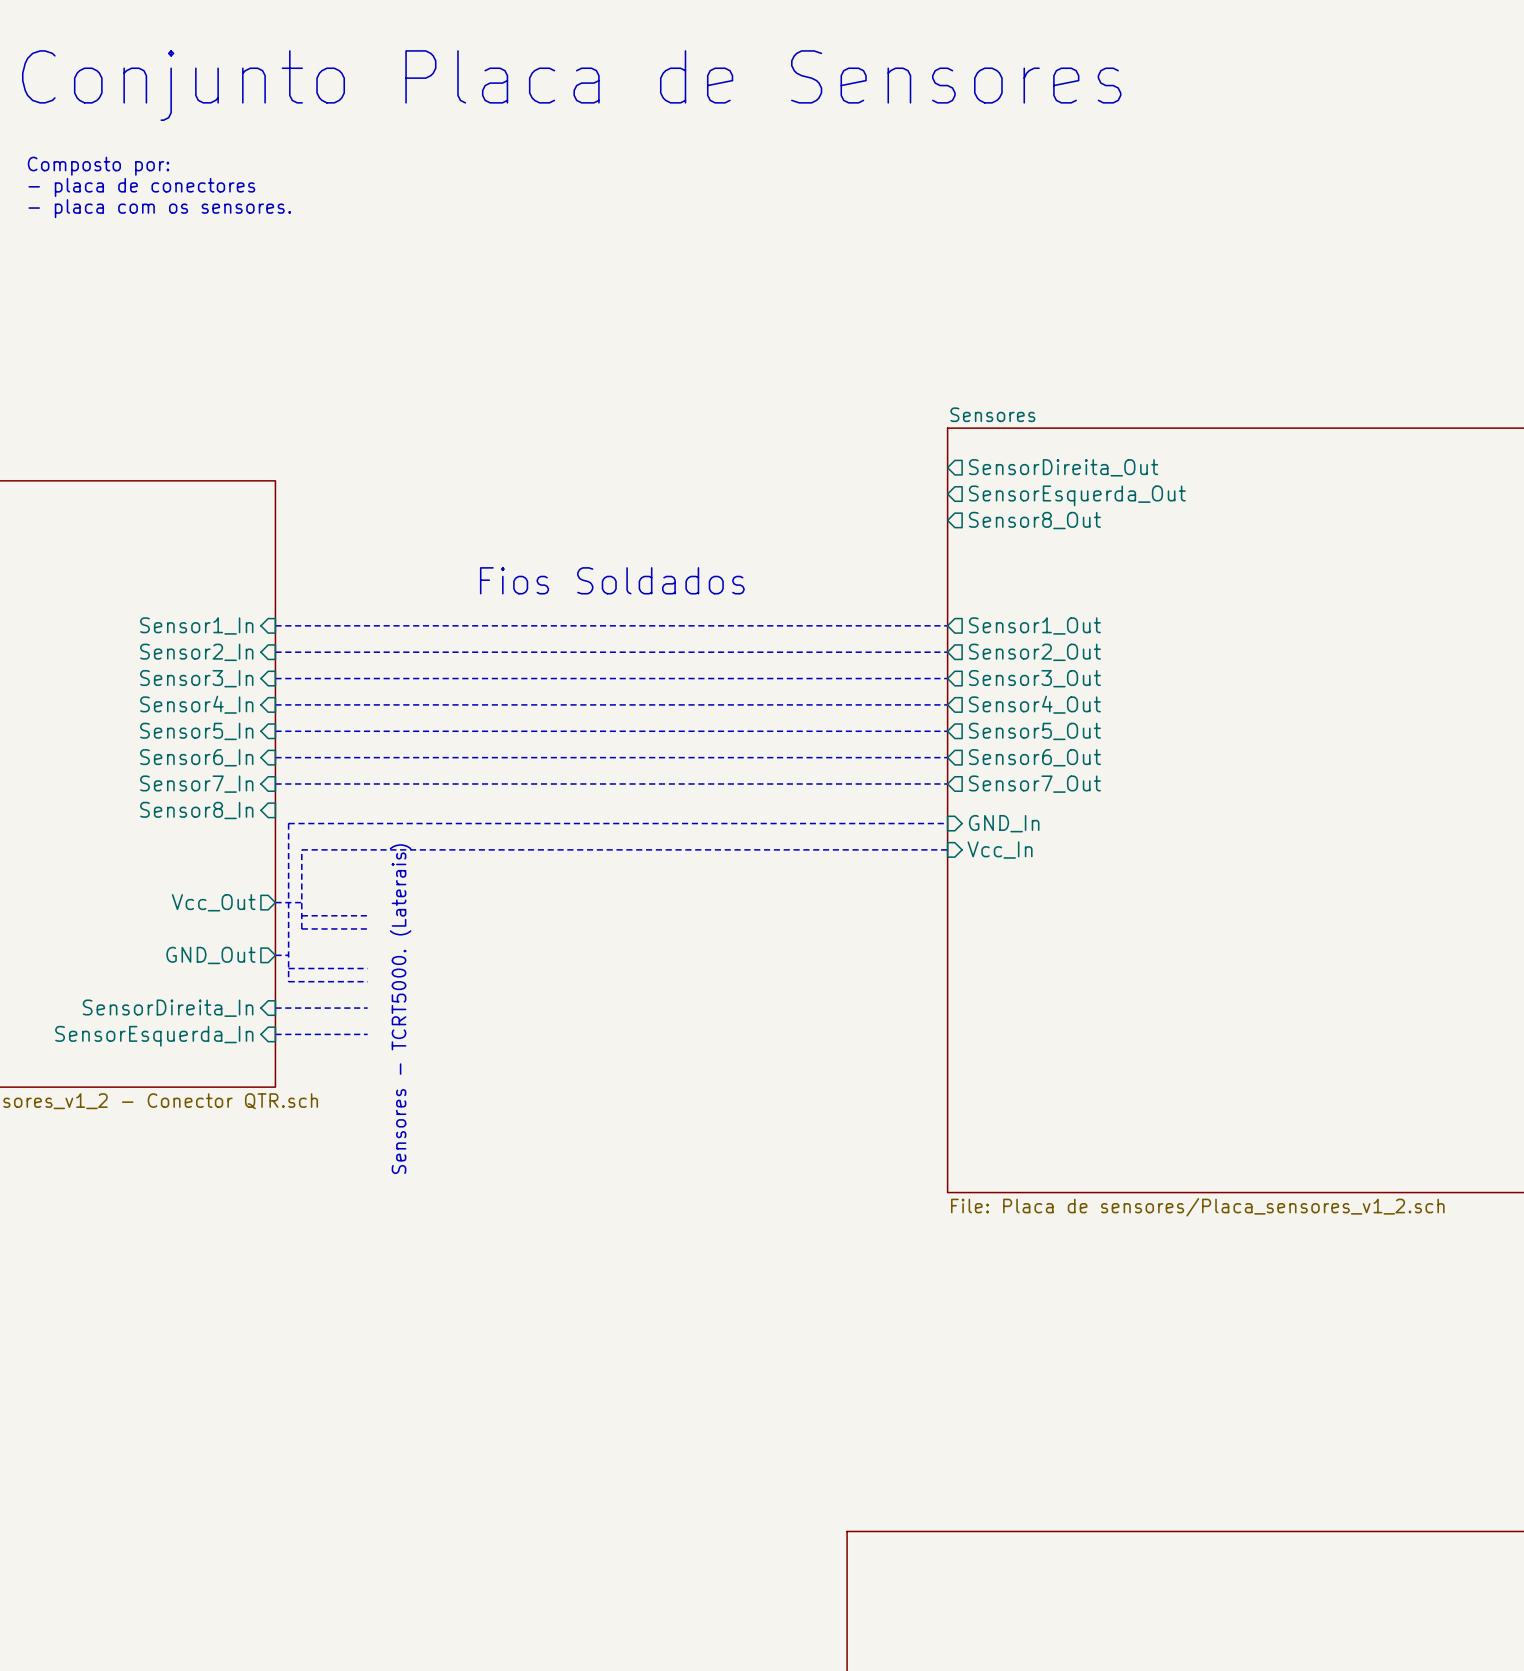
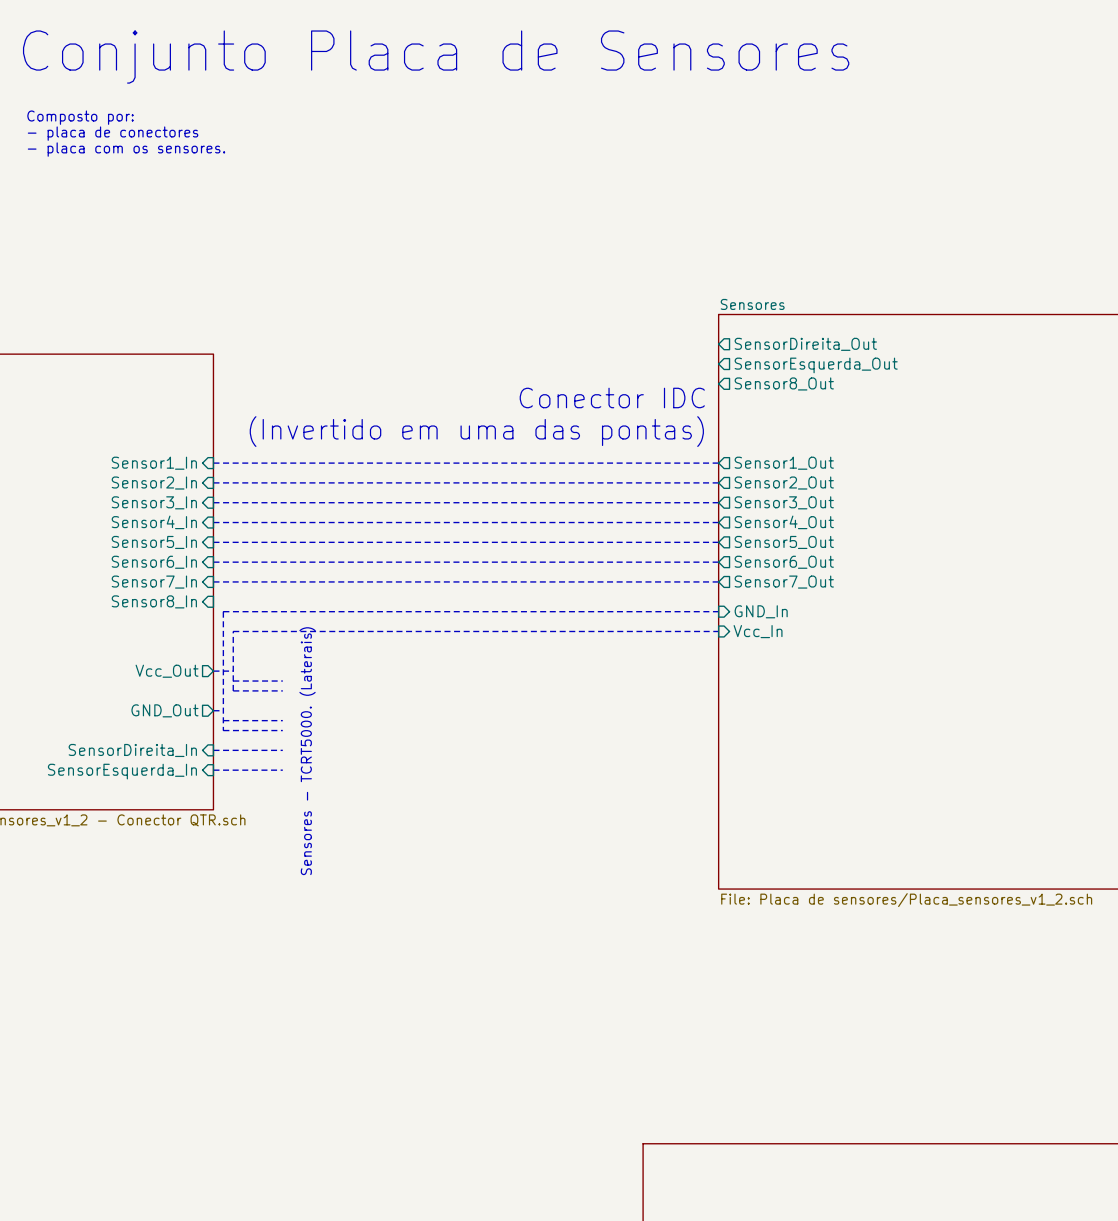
text: none -> Conector IDC (612, 397)
text: Fios Soldados (612, 580) -> none
text: none -> (Invertido em uma das pontas) (476, 431)

